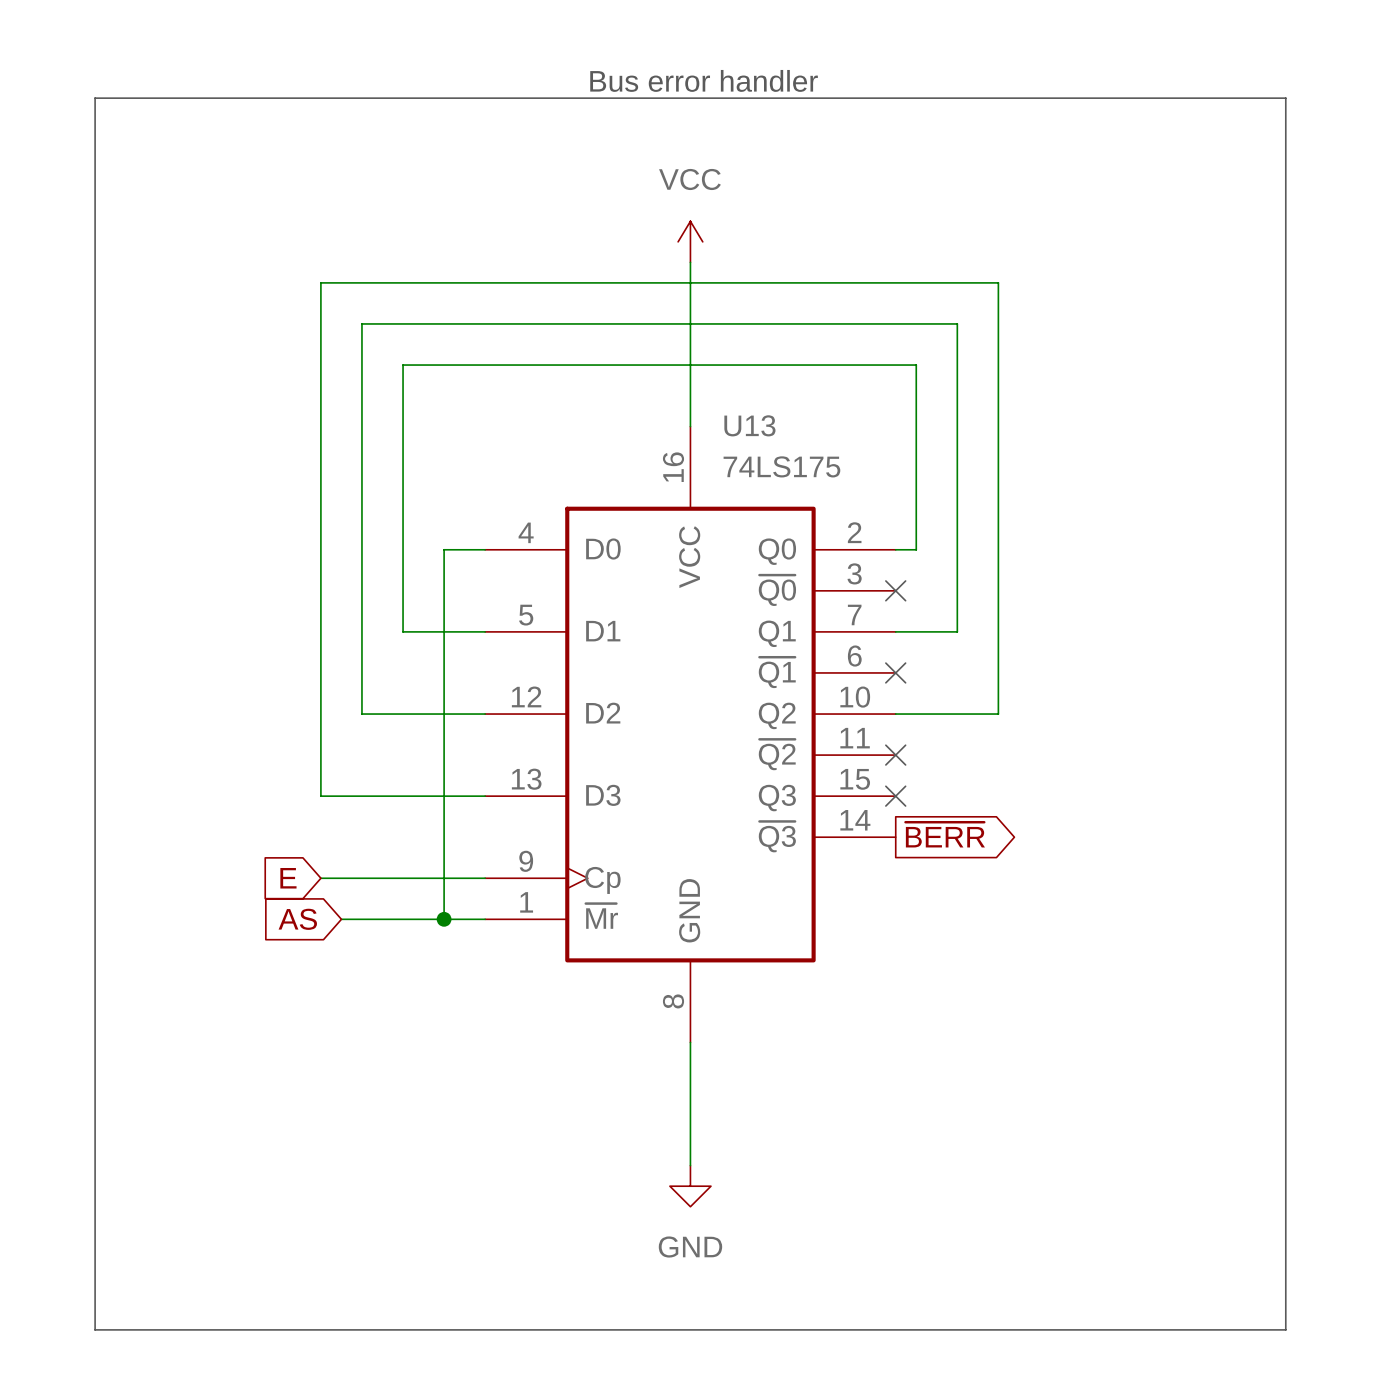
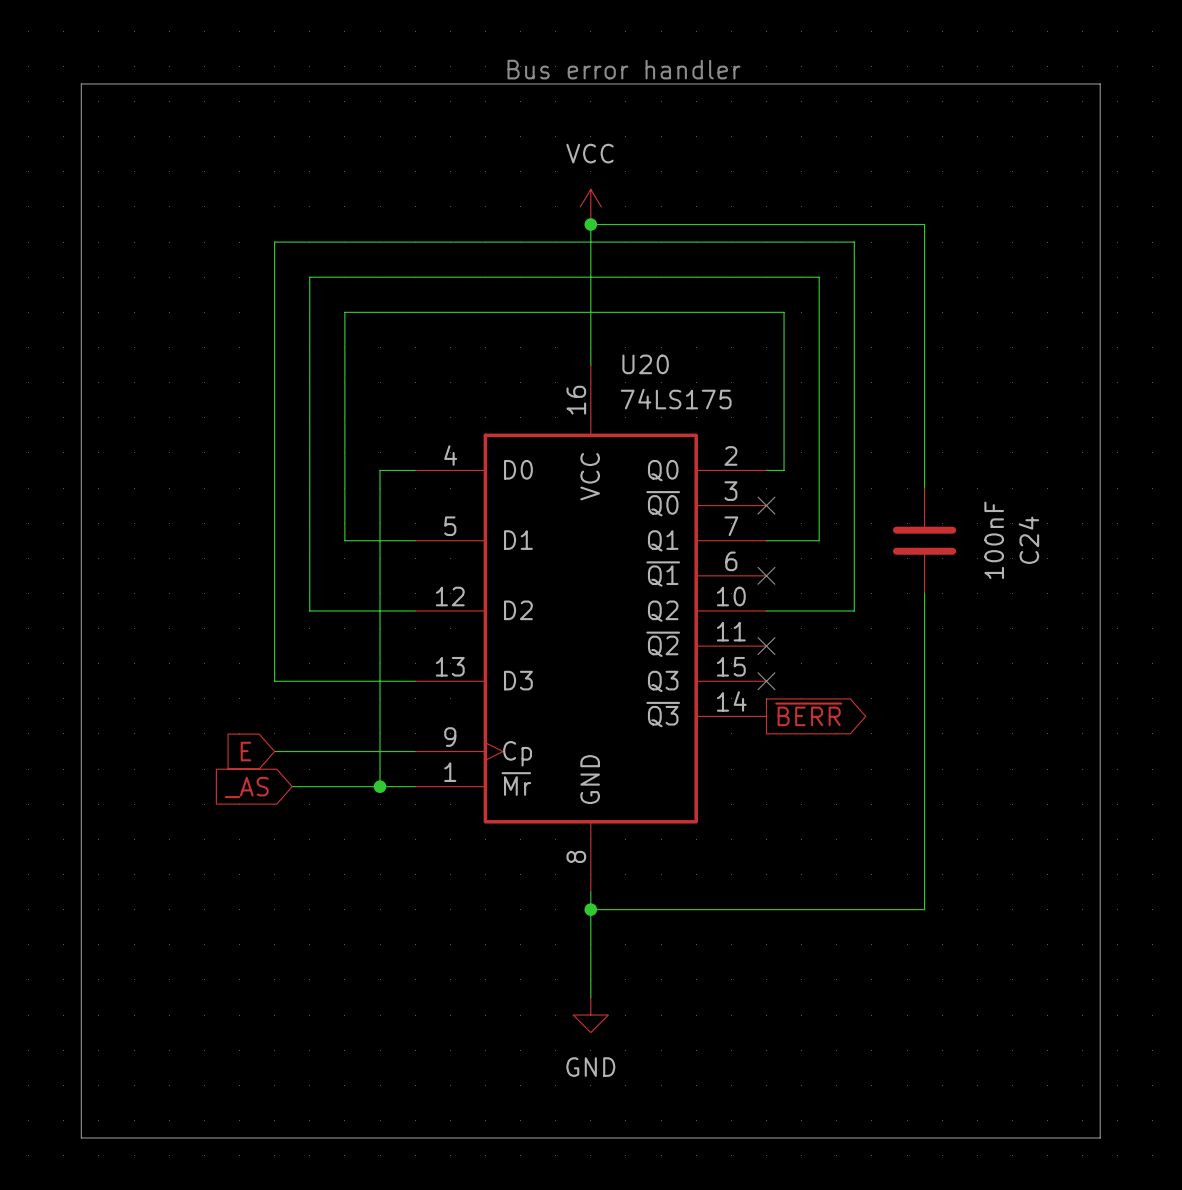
wire: none -> (590, 224) (924, 224) (924, 488)
junction: none -> (590, 224)
U13 name: U13 (749, 425) -> U20 (645, 364)
C24: none -> 100nF (924, 540)
wire: none -> (924, 593) (924, 909) (590, 909)
global label: AS (297, 919) -> _AS (246, 787)
junction: none -> (590, 909)

